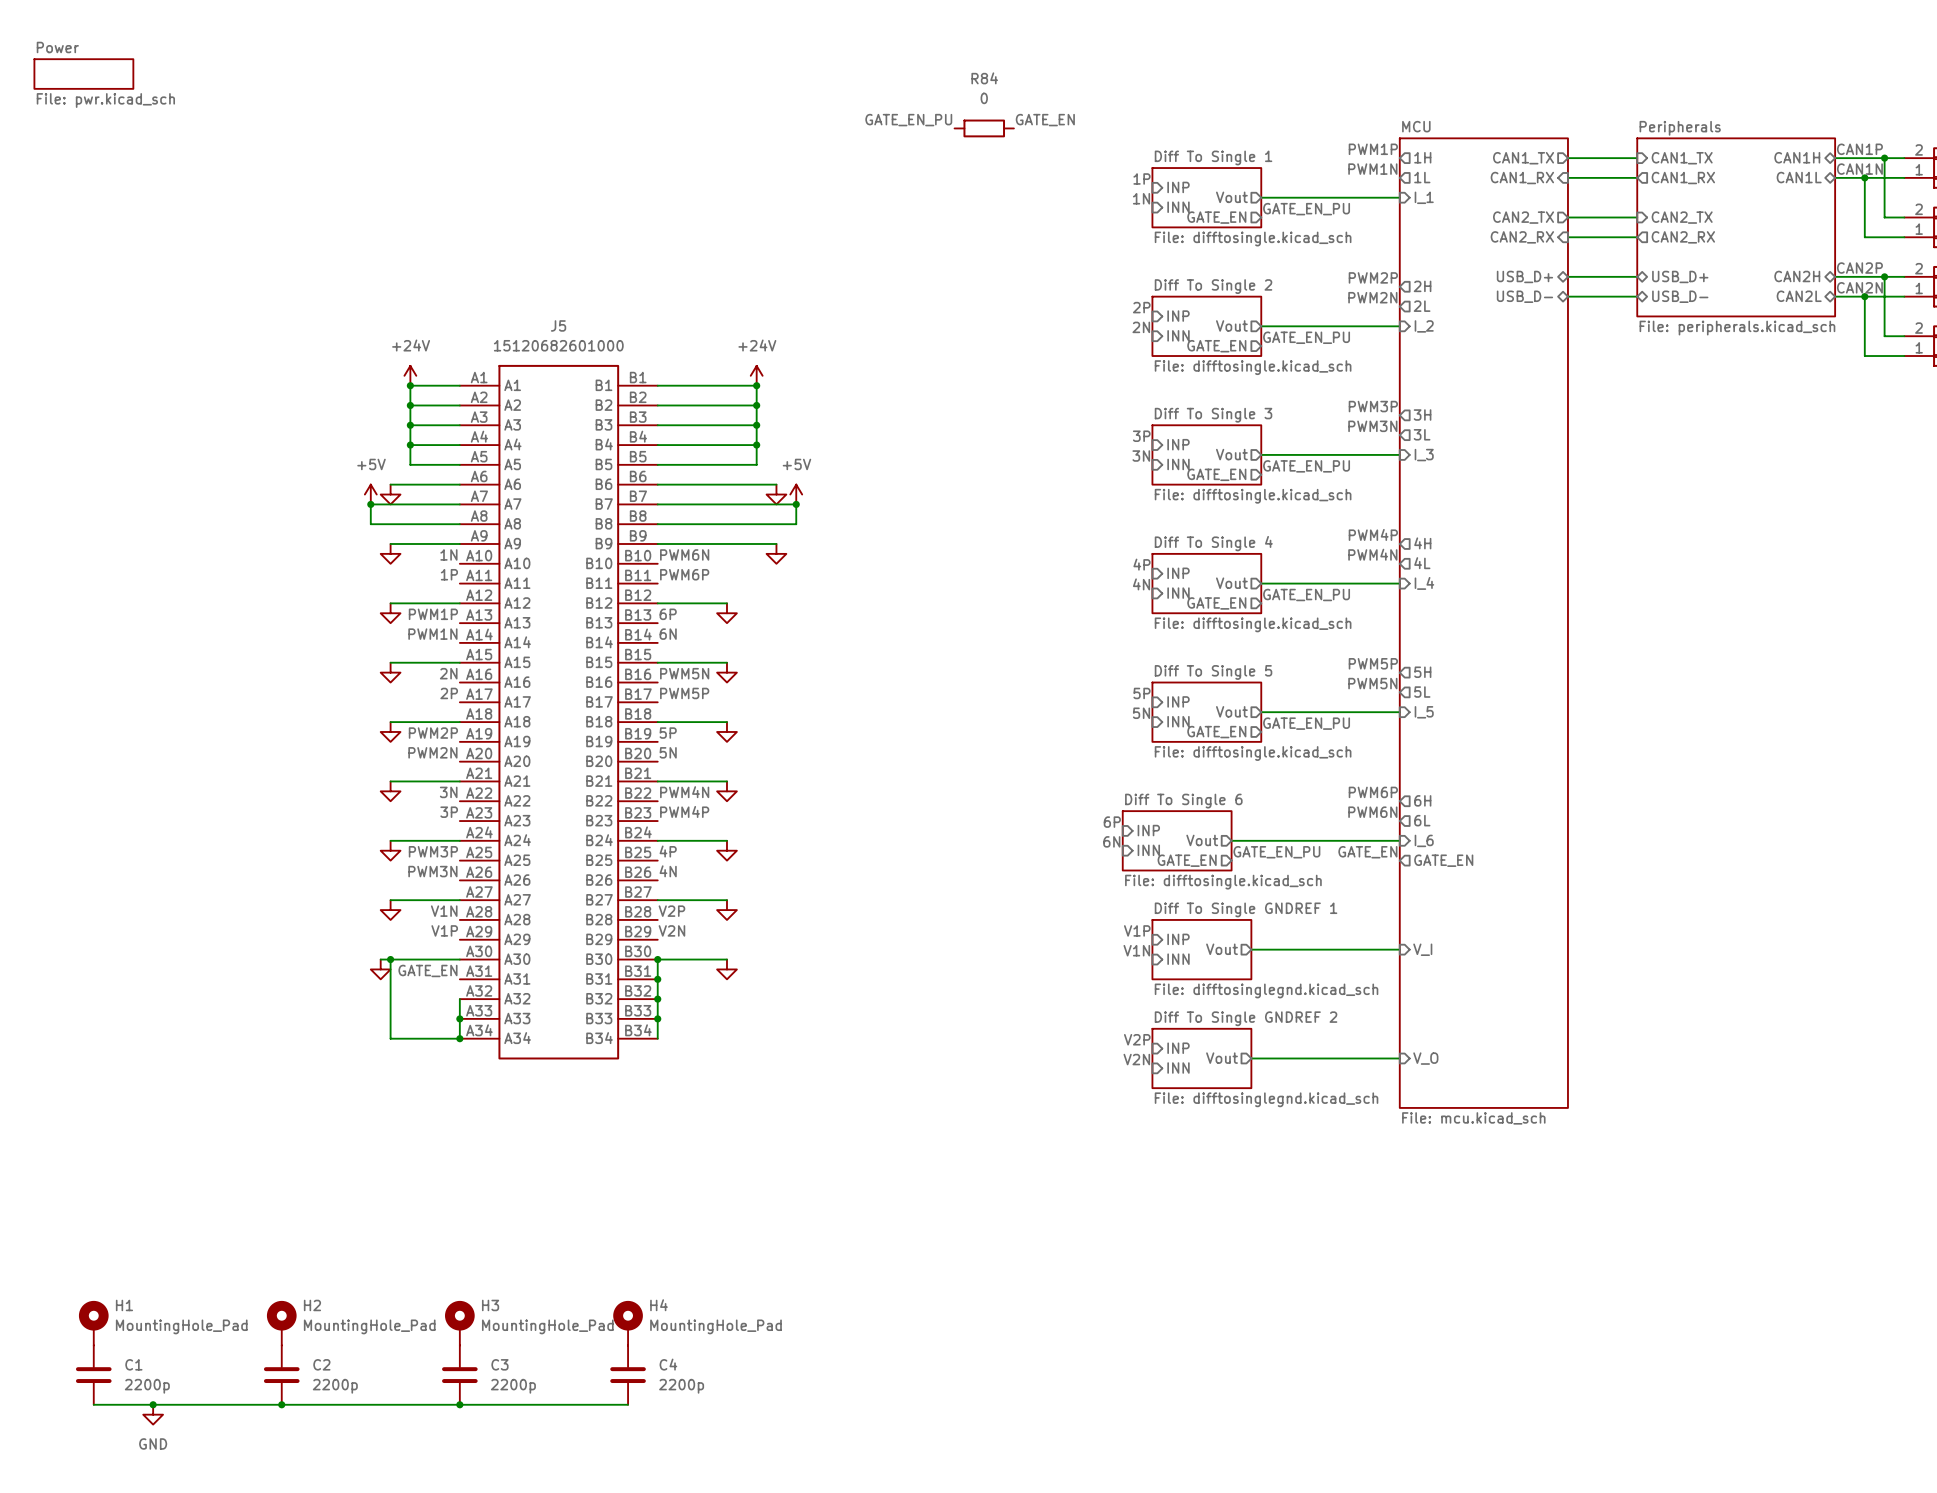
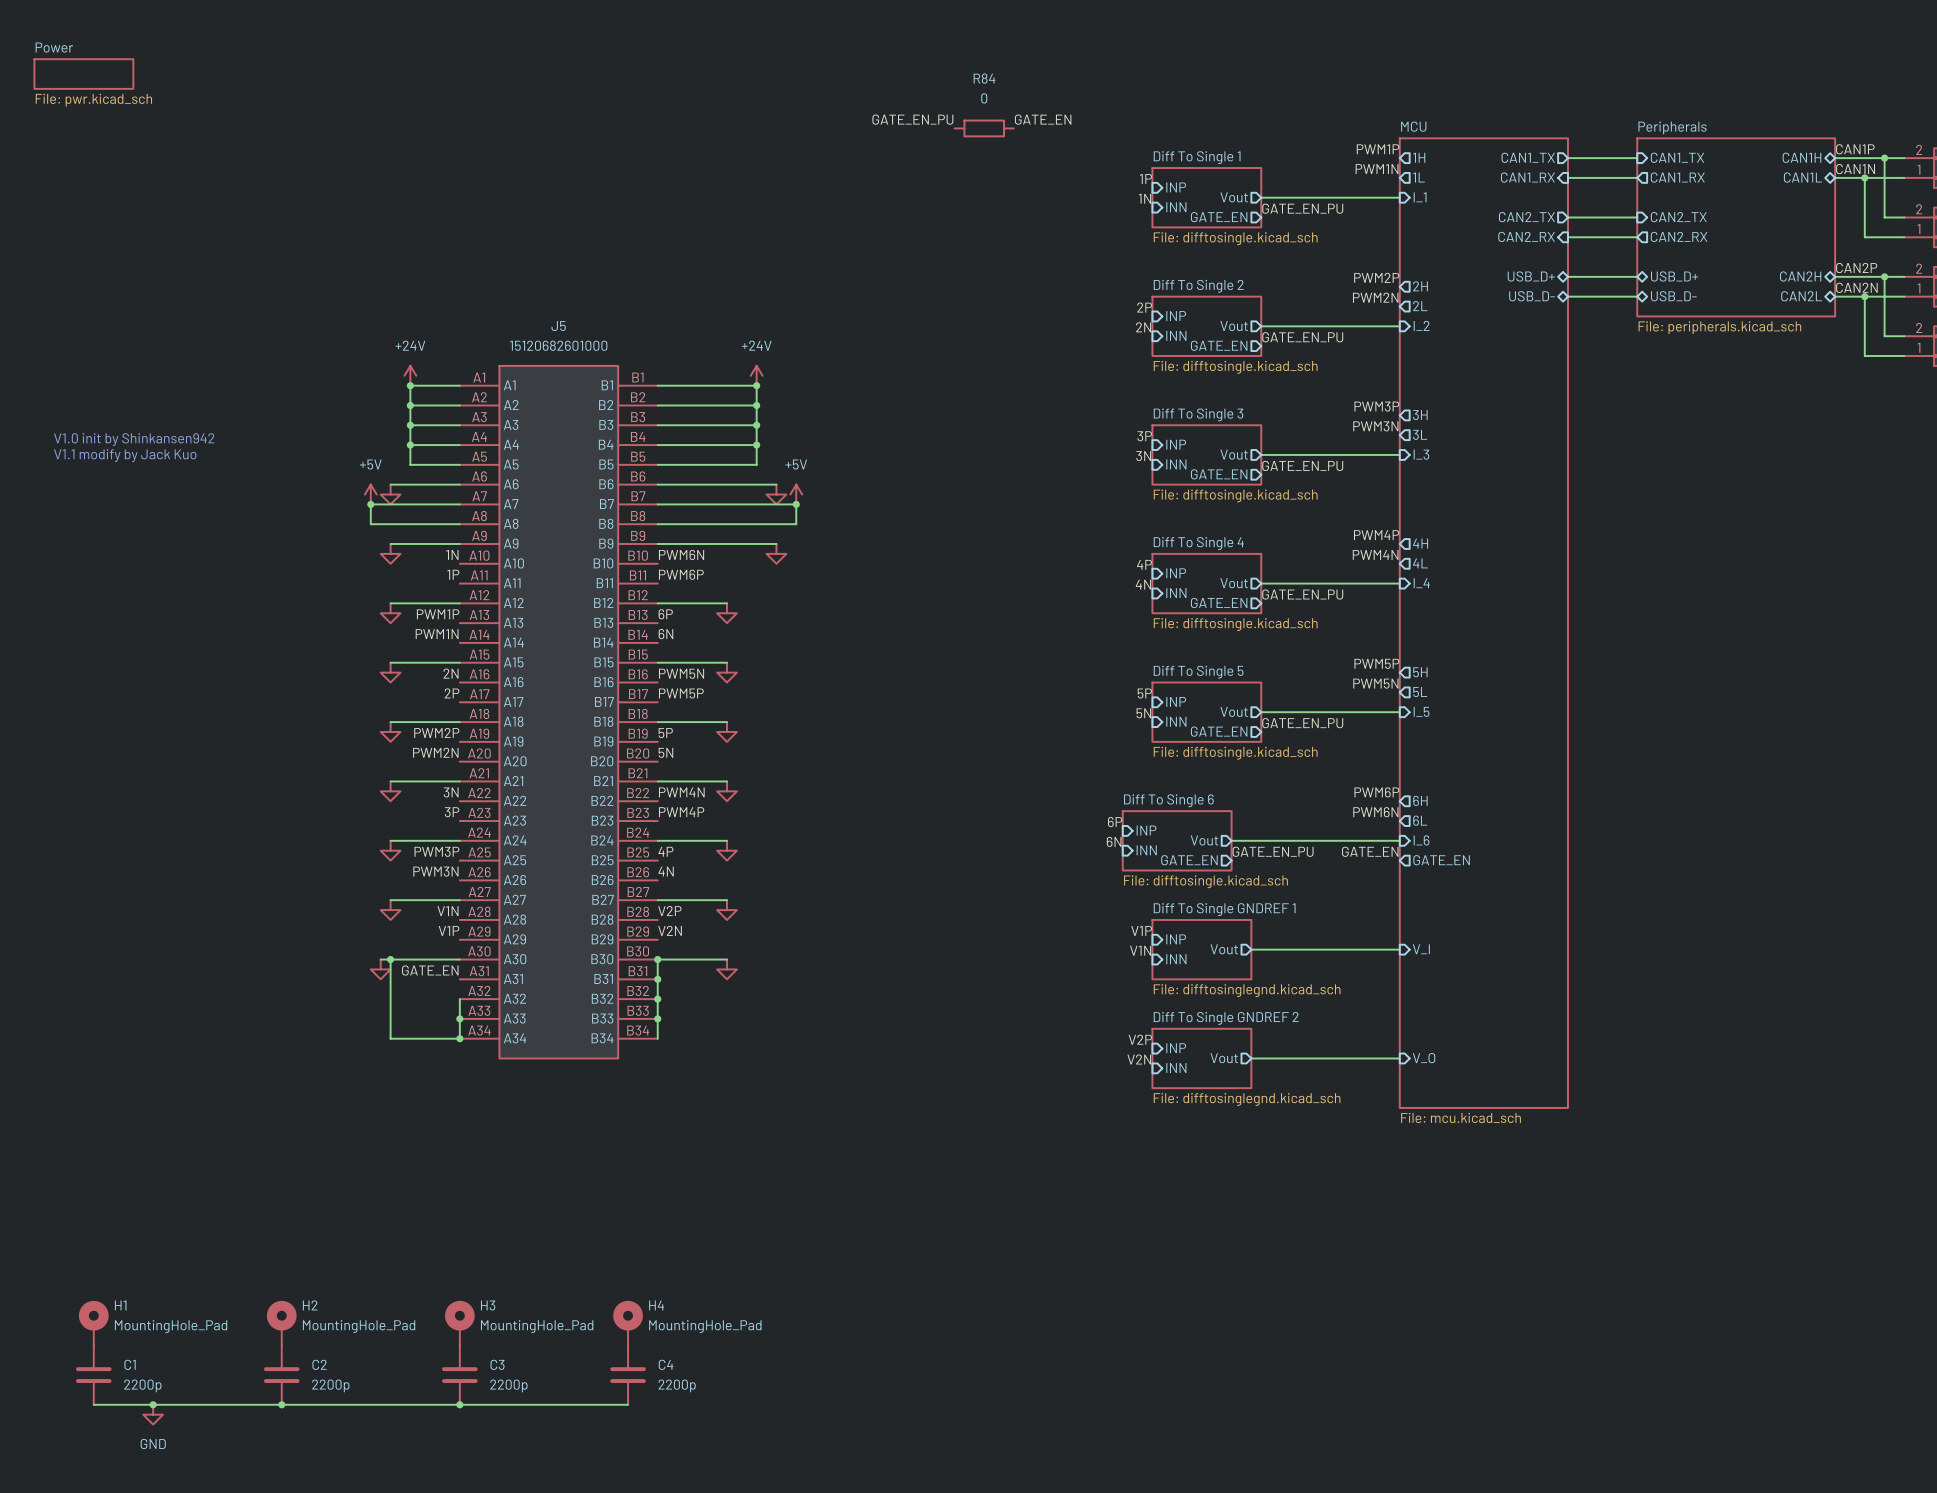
text: none -> V1.0 init by Shinkansen942 (134, 439)
text: none -> V1.1 modify by Jack Kuo (125, 455)

